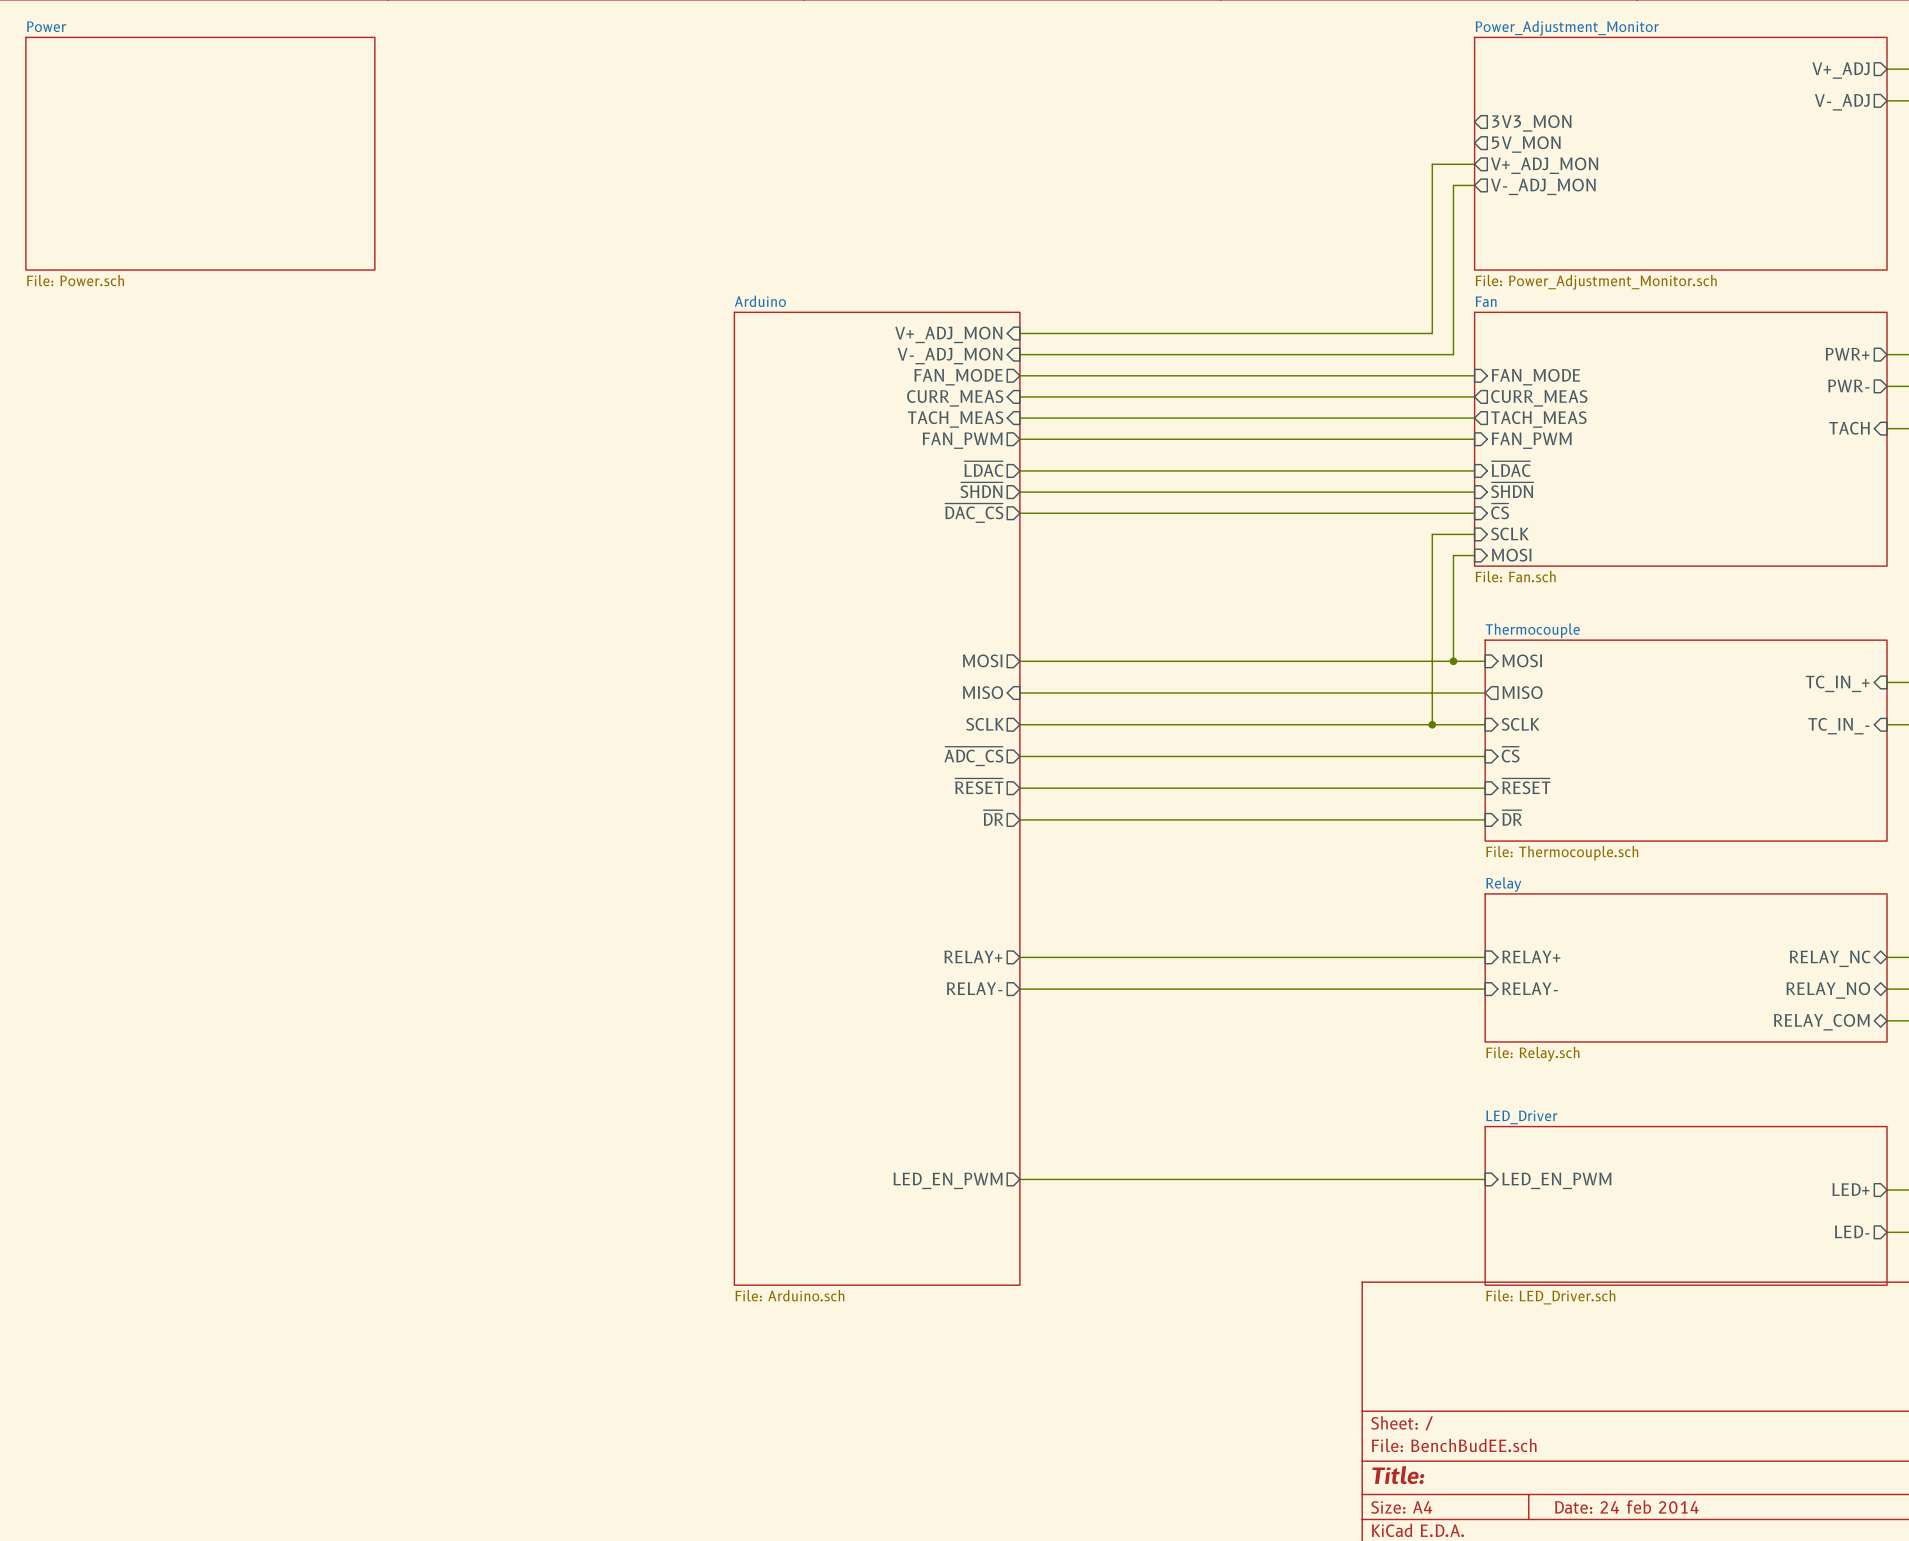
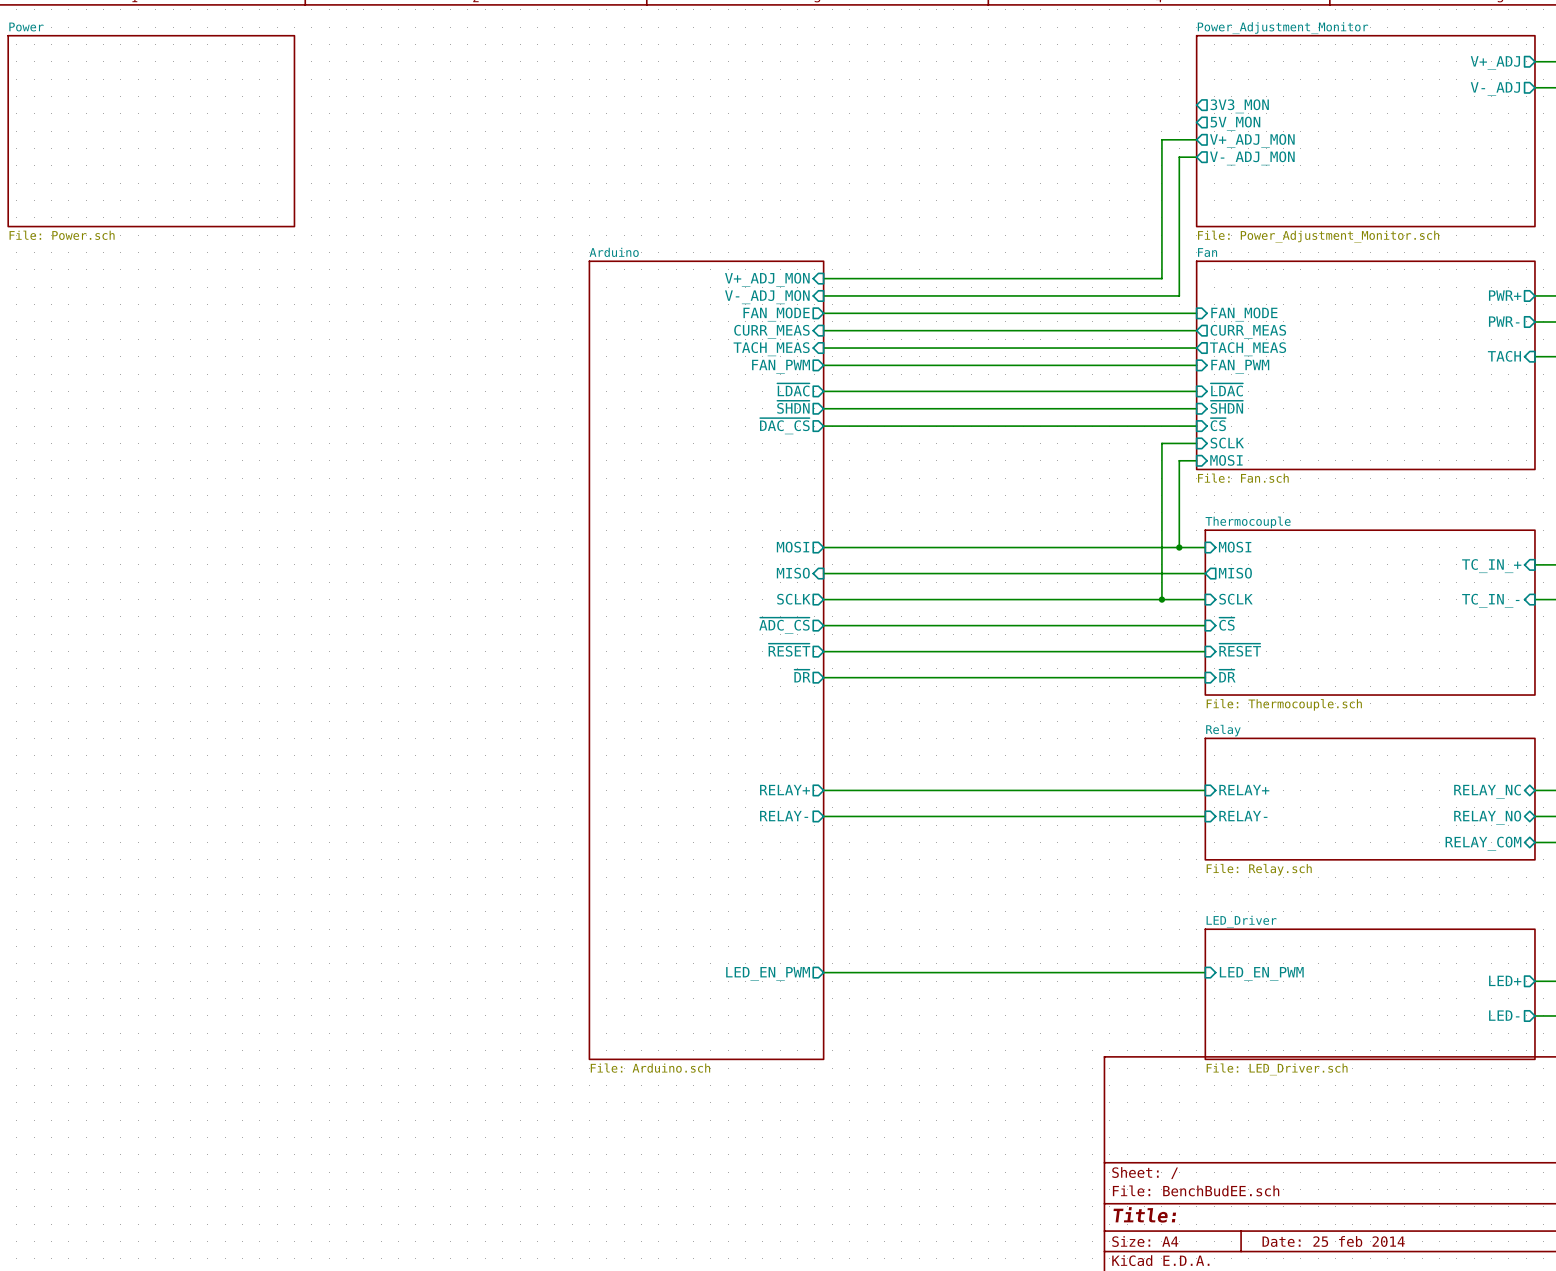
title block: Date: 24 feb 2014 (1626, 1507) -> Date: 25 feb 2014 (1333, 1241)

